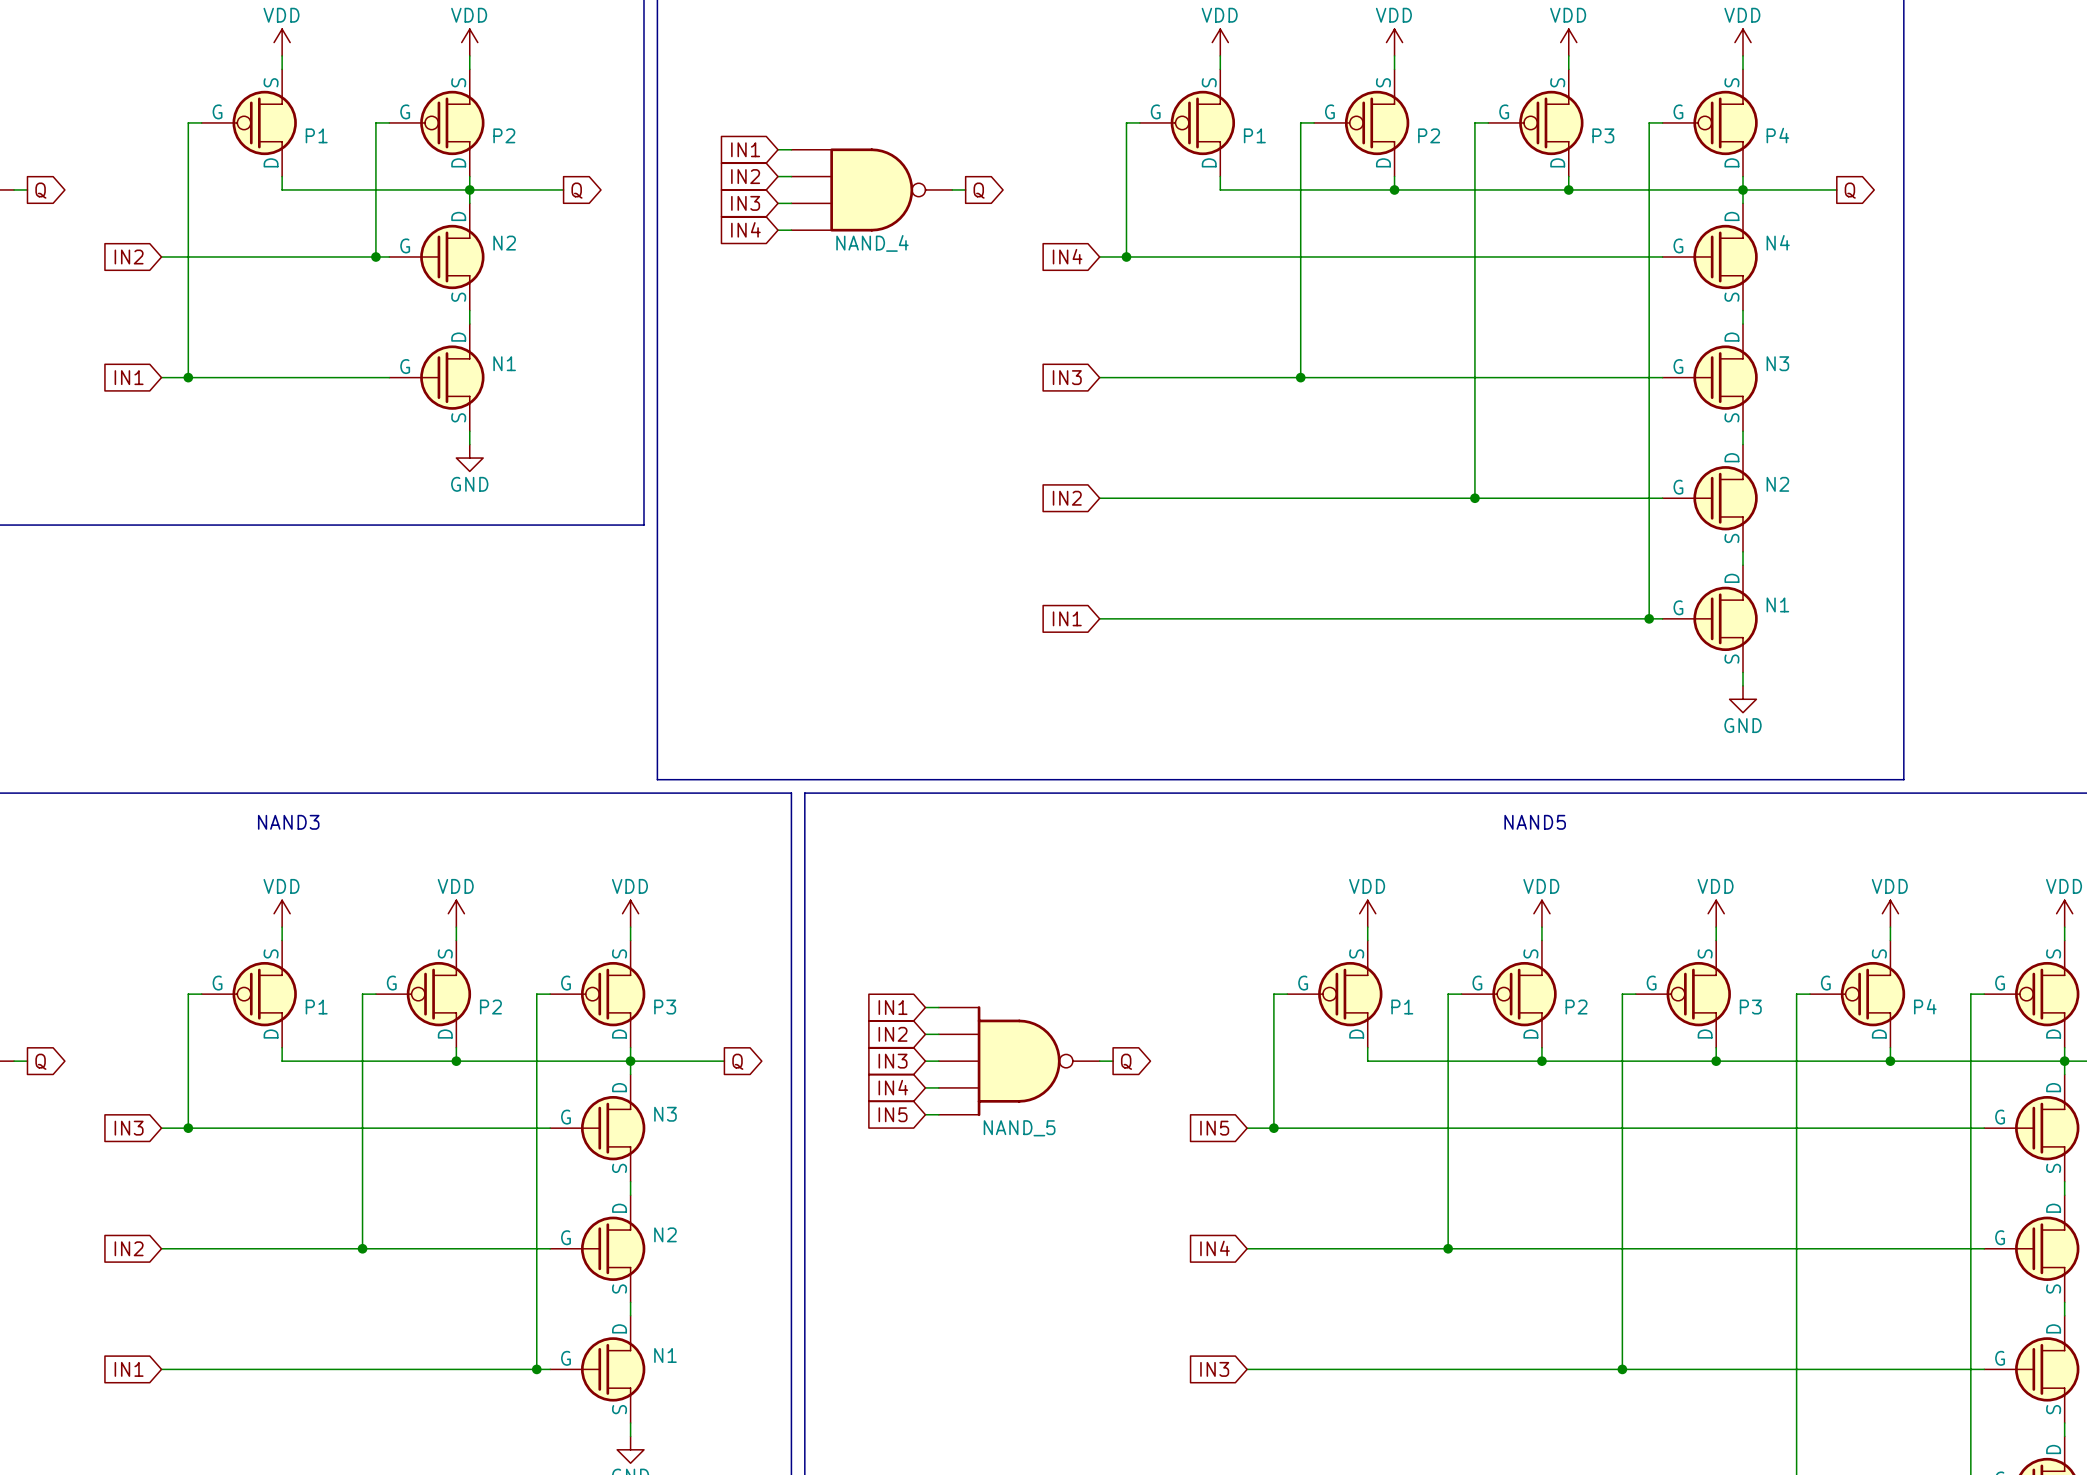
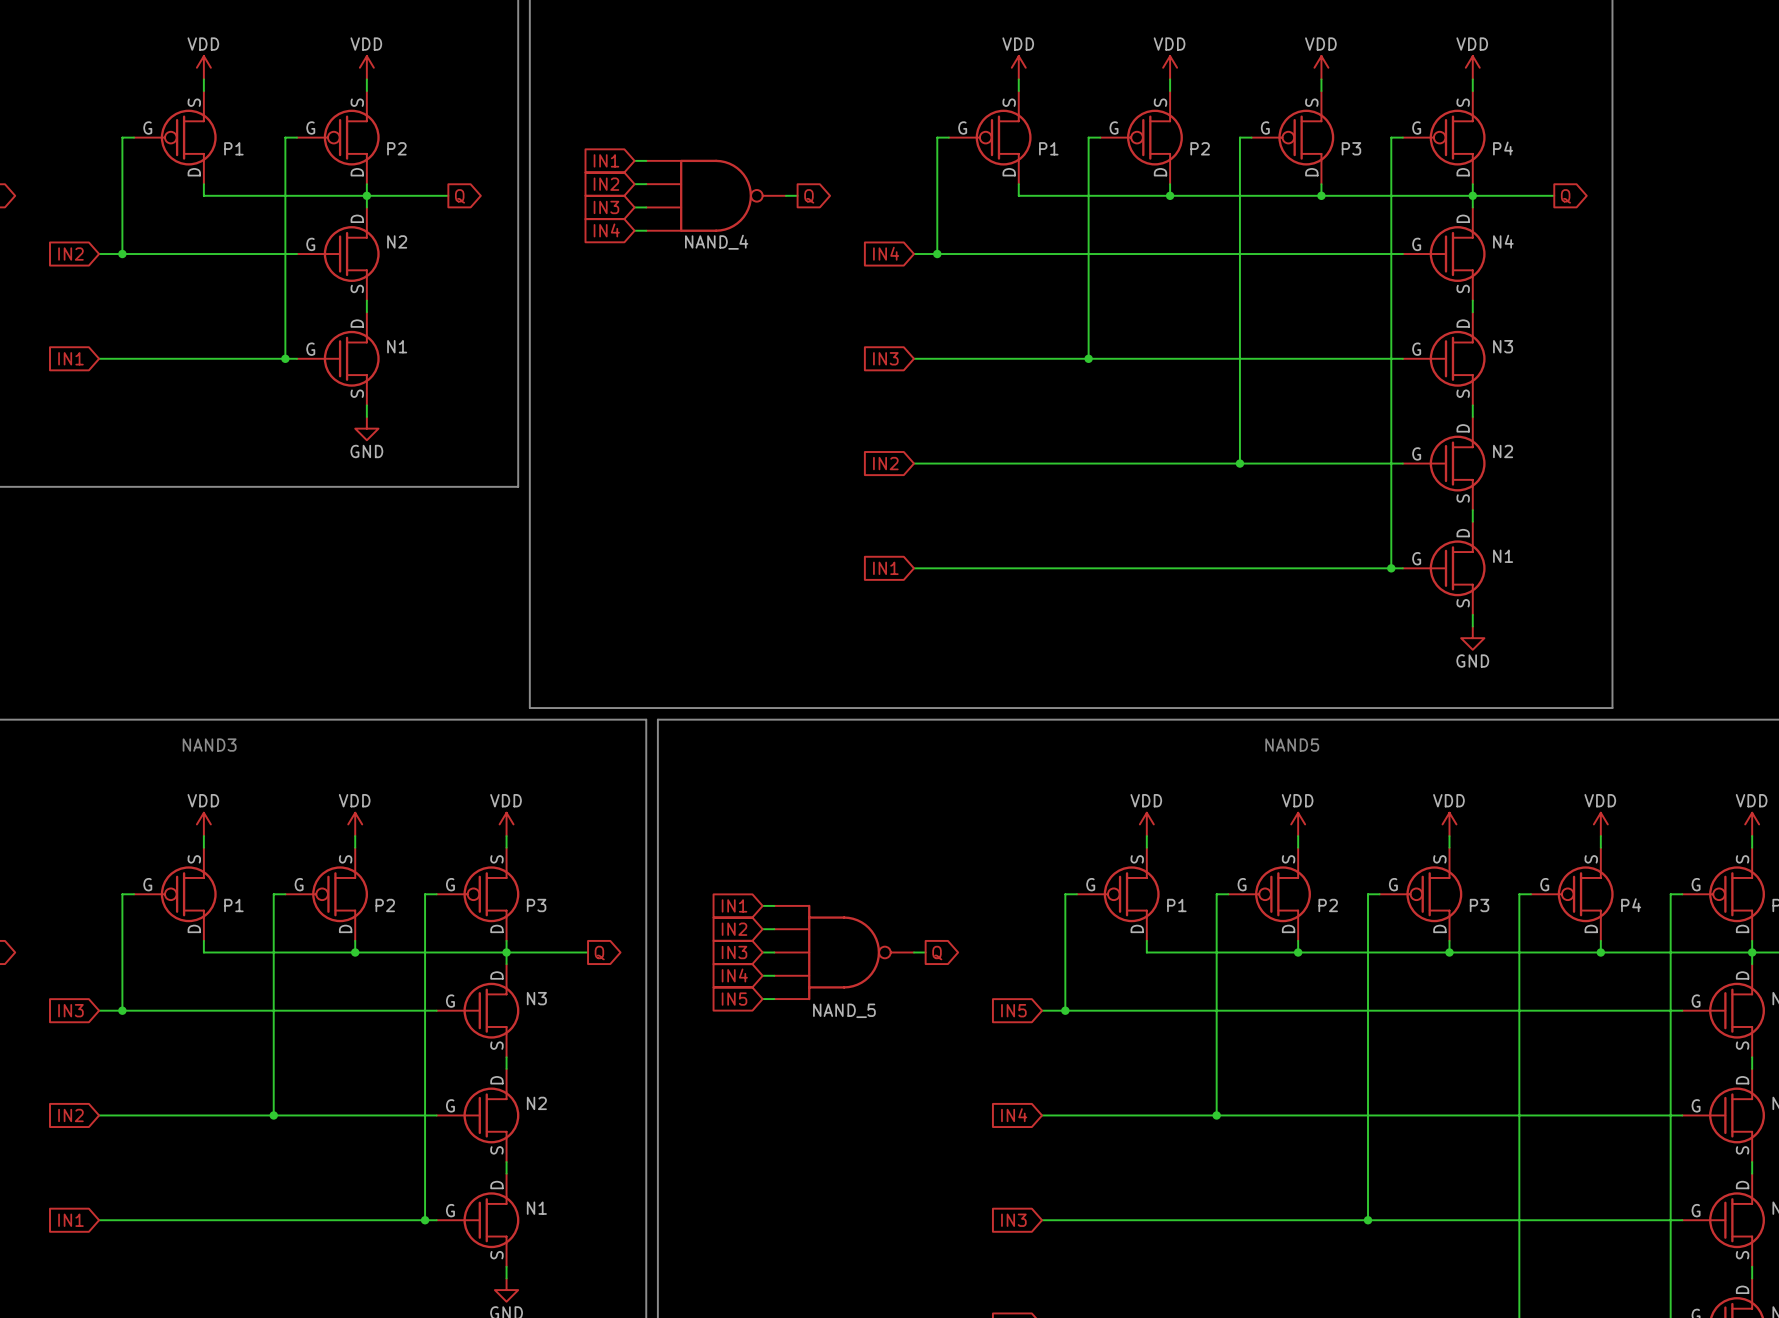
wire: (188, 256) (188, 377) -> (285, 254) (285, 358)
junction: none -> (122, 254)
junction: (375, 256) -> none
junction: (188, 377) -> none
junction: none -> (285, 358)

